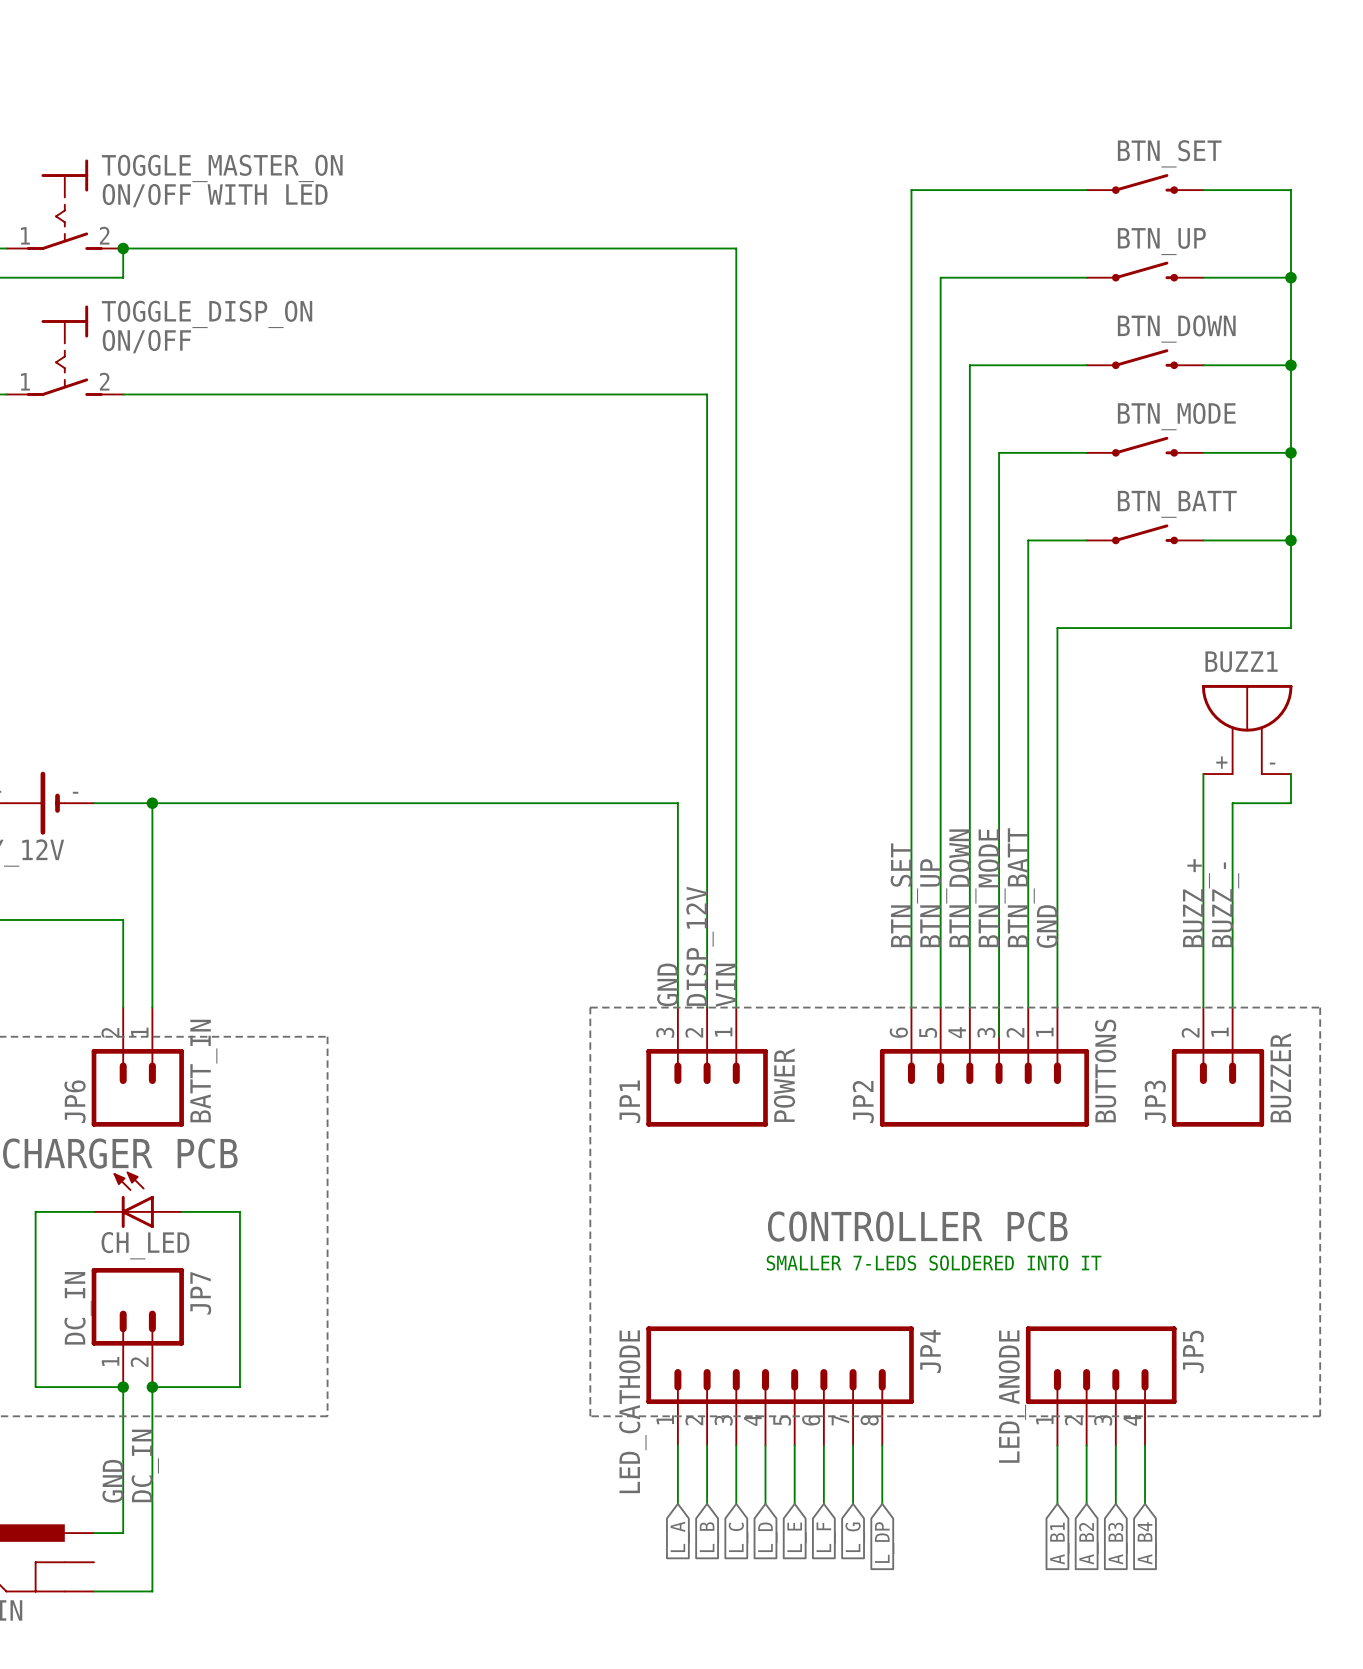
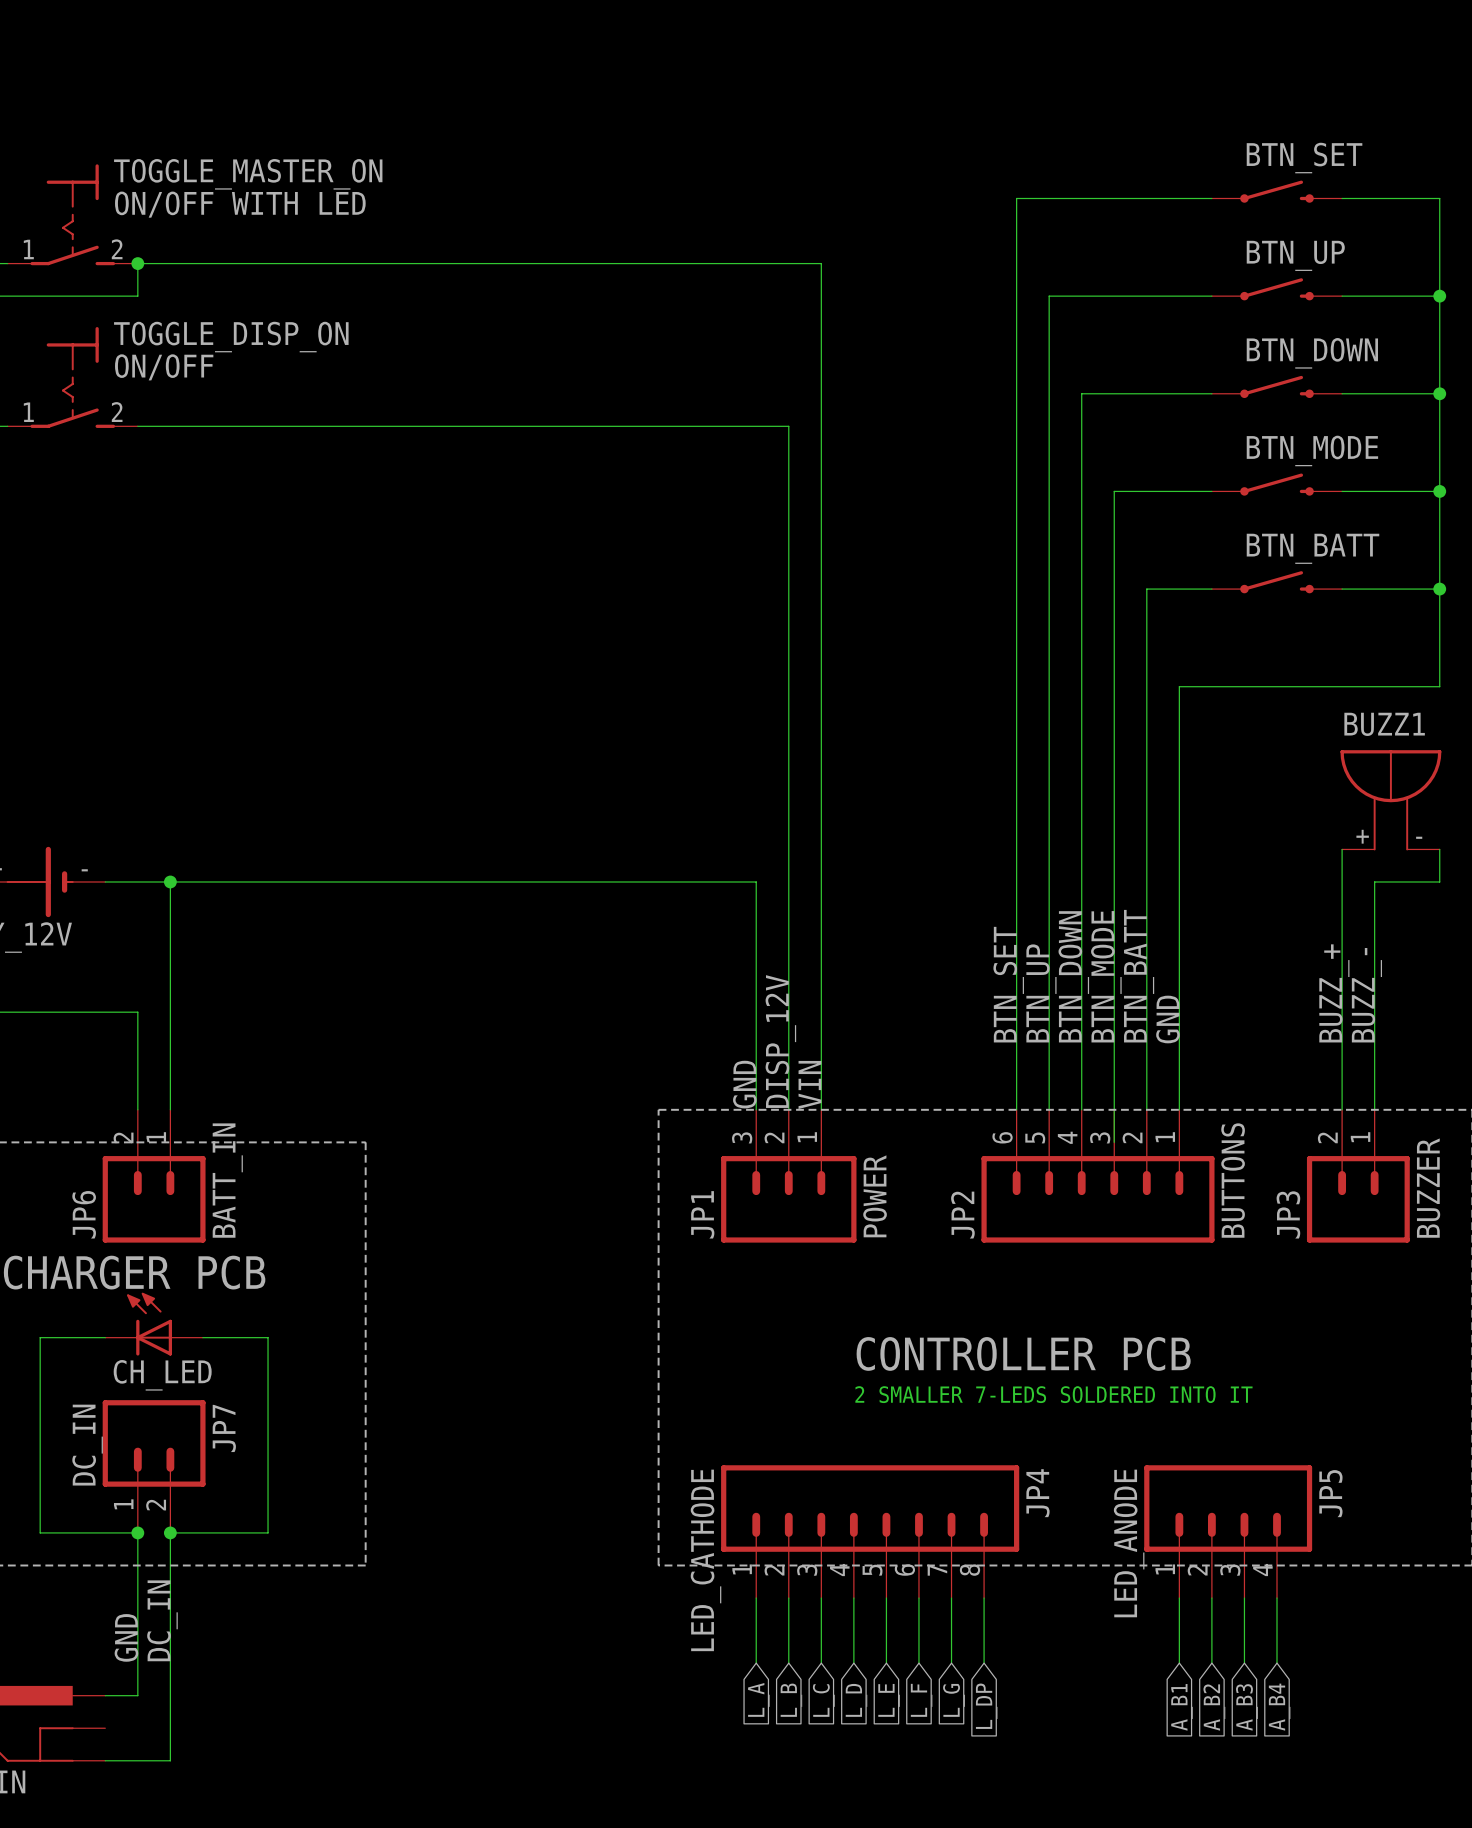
text: SMALLER 7-LEDS SOLDERED INTO IT (934, 1263) -> 2 SMALLER 7-LEDS SOLDERED INTO IT (1053, 1394)

